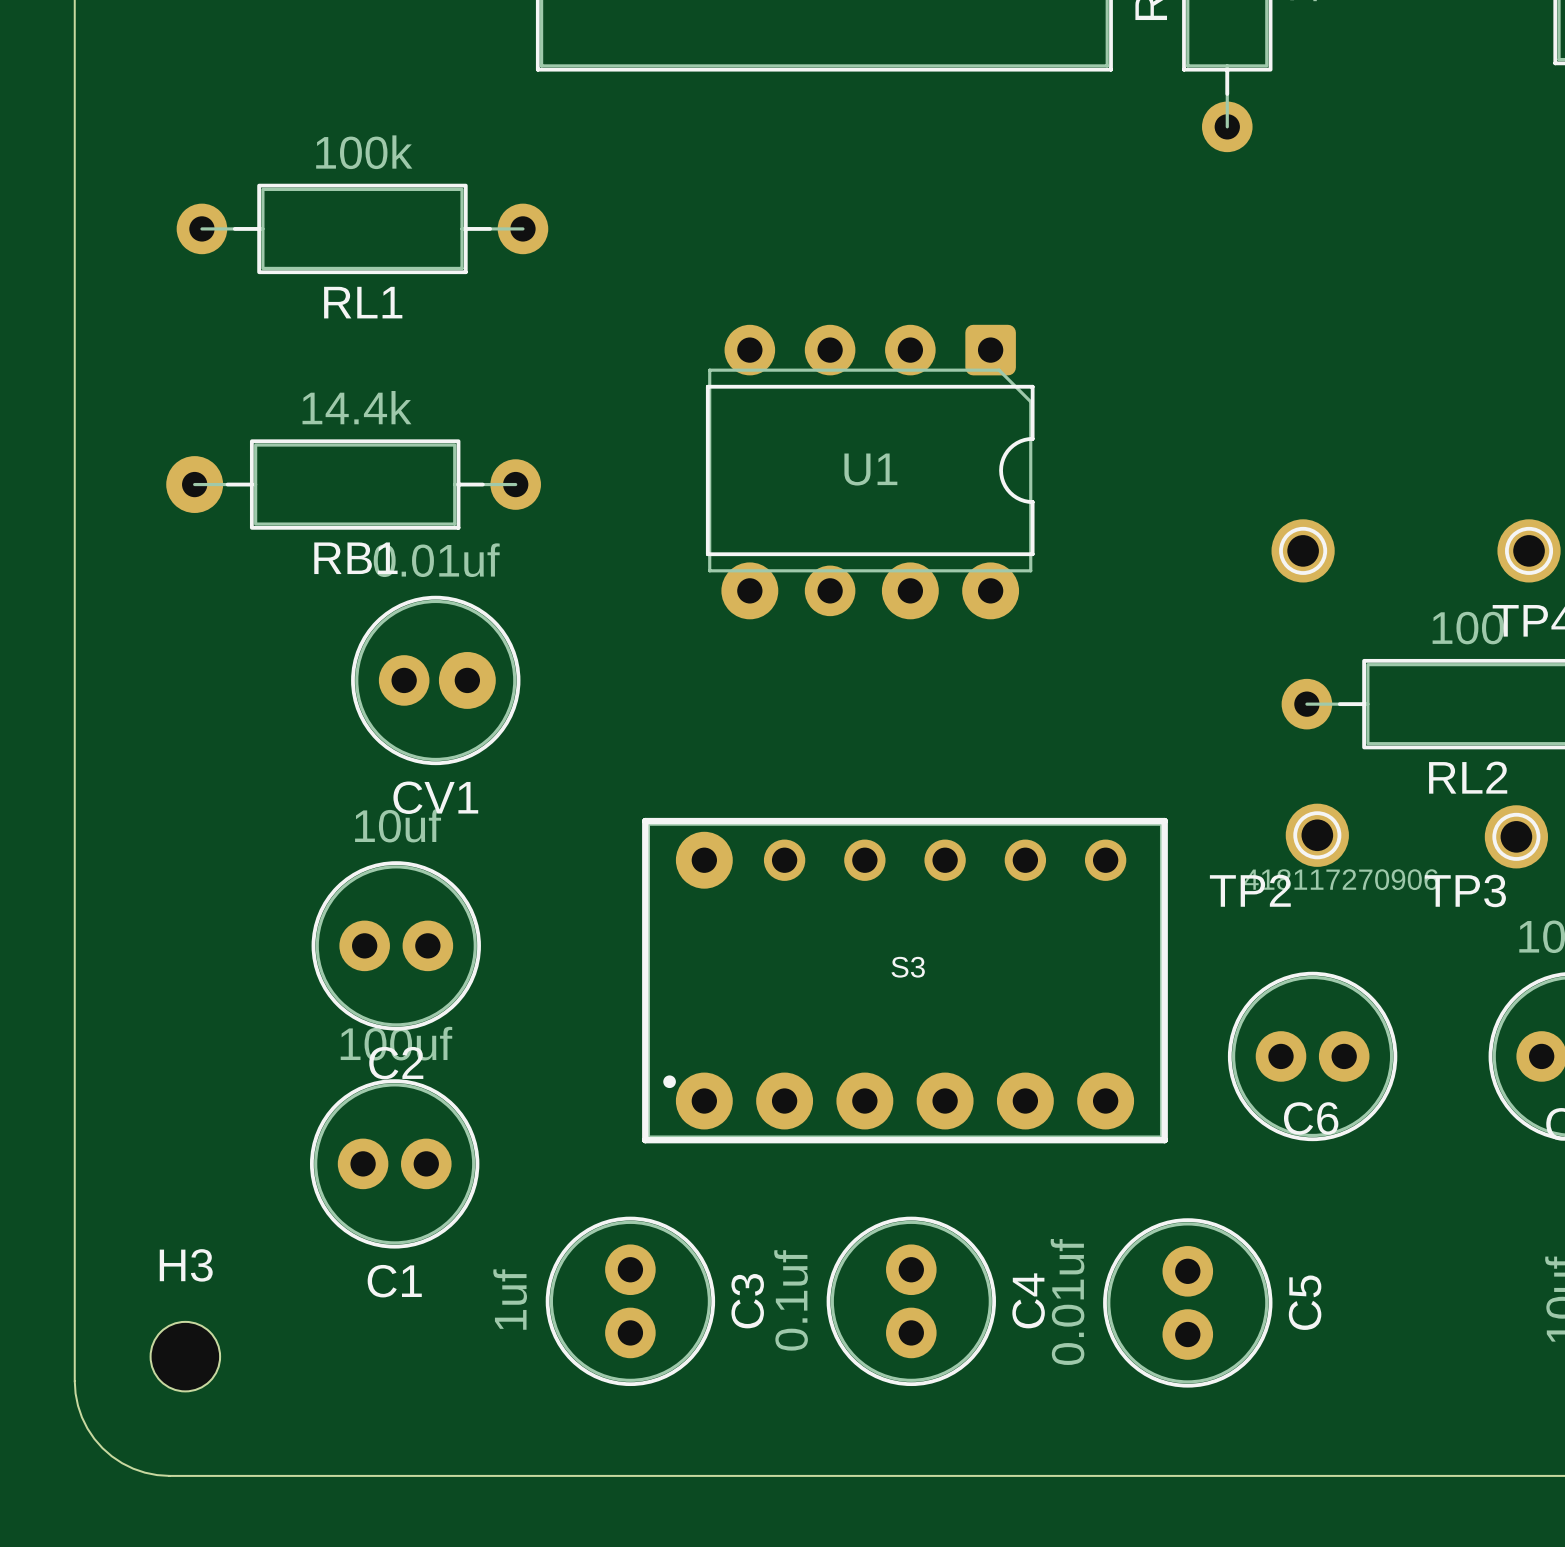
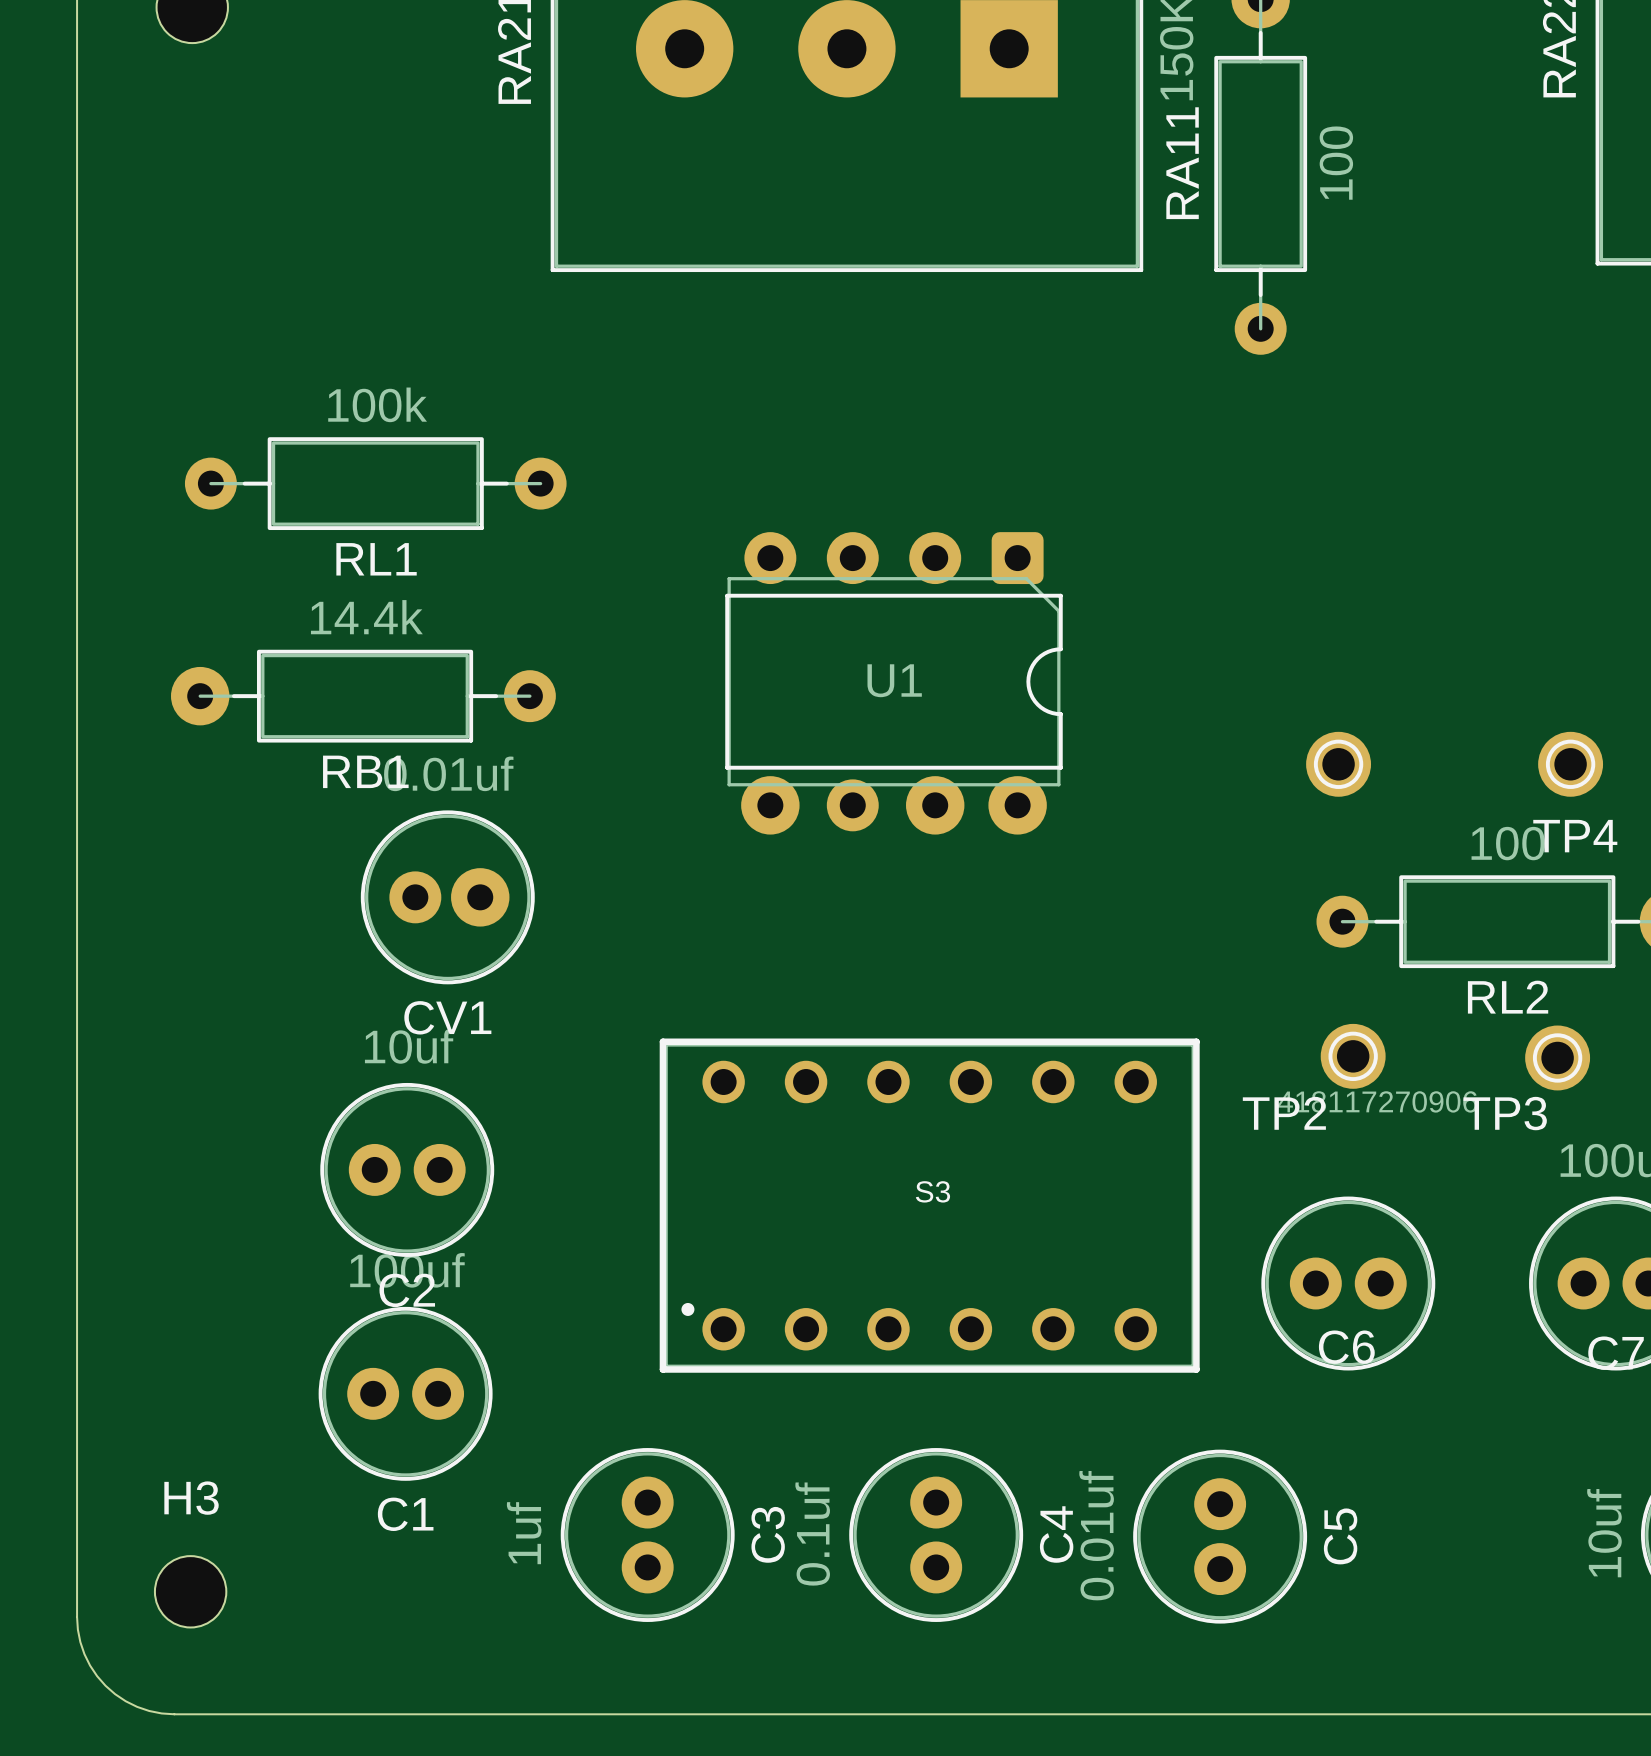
RL1 position: (362, 228) -> (375, 483)
S3 footprint: [642, 817, 1168, 1144] -> [659, 1038, 1200, 1373]

